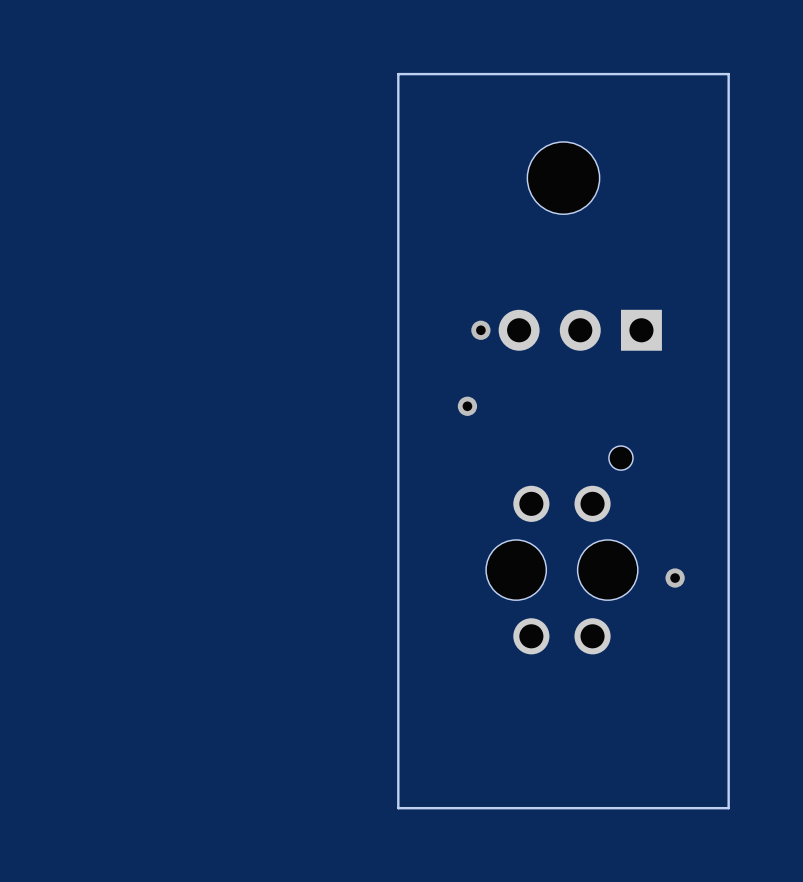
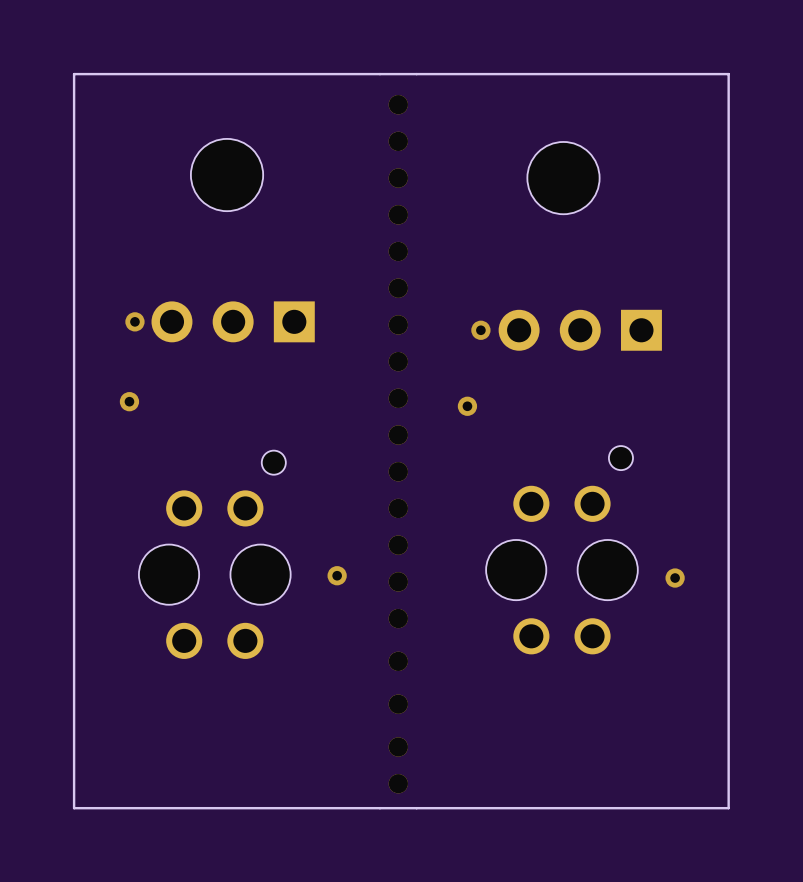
board edge: (398, 74) (398, 808) -> (398, 74) (74, 74) (74, 808) (398, 808)
via: none -> (398, 104)
via: none -> (398, 141)
part: none -> (227, 175)
via: none -> (398, 178)
via: none -> (398, 214)
via: none -> (398, 251)
via: none -> (398, 288)
via: none -> (134, 321)
part: none -> (233, 321)
via: none -> (398, 324)
via: none -> (398, 361)
via: none -> (398, 398)
via: none -> (129, 401)
via: none -> (398, 435)
via: none -> (398, 471)
via: none -> (398, 508)
via: none -> (398, 545)
part: none -> (214, 554)
via: none -> (337, 575)
via: none -> (398, 581)
via: none -> (398, 618)
via: none -> (398, 661)
via: none -> (398, 704)
via: none -> (398, 747)
via: none -> (398, 783)

